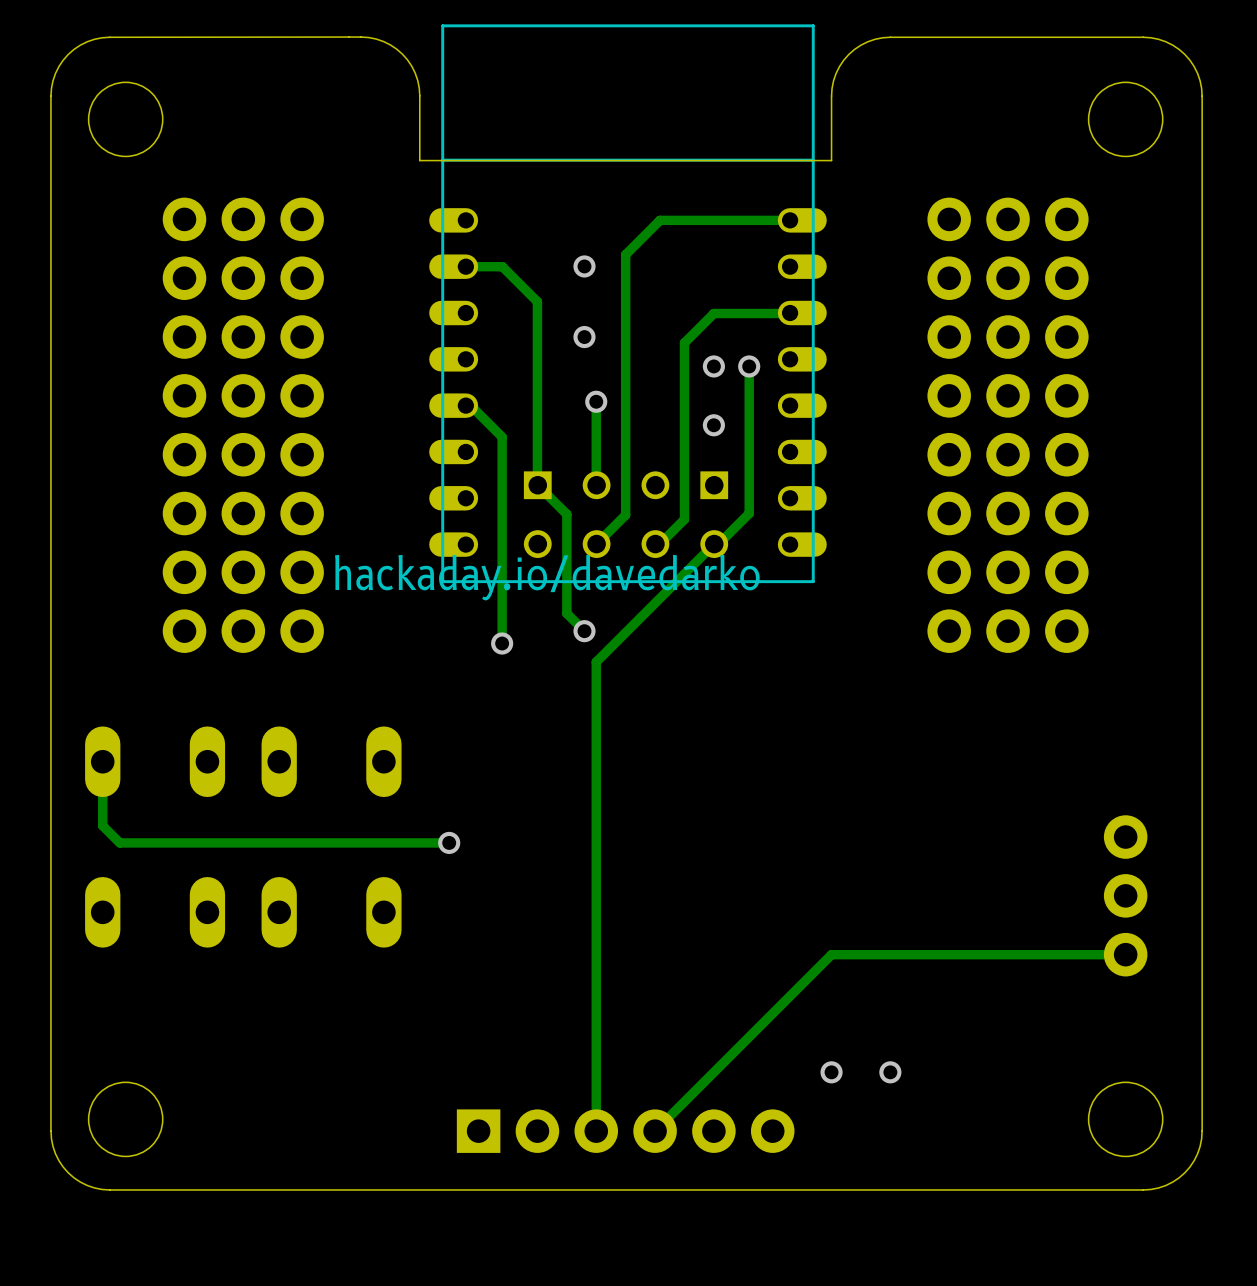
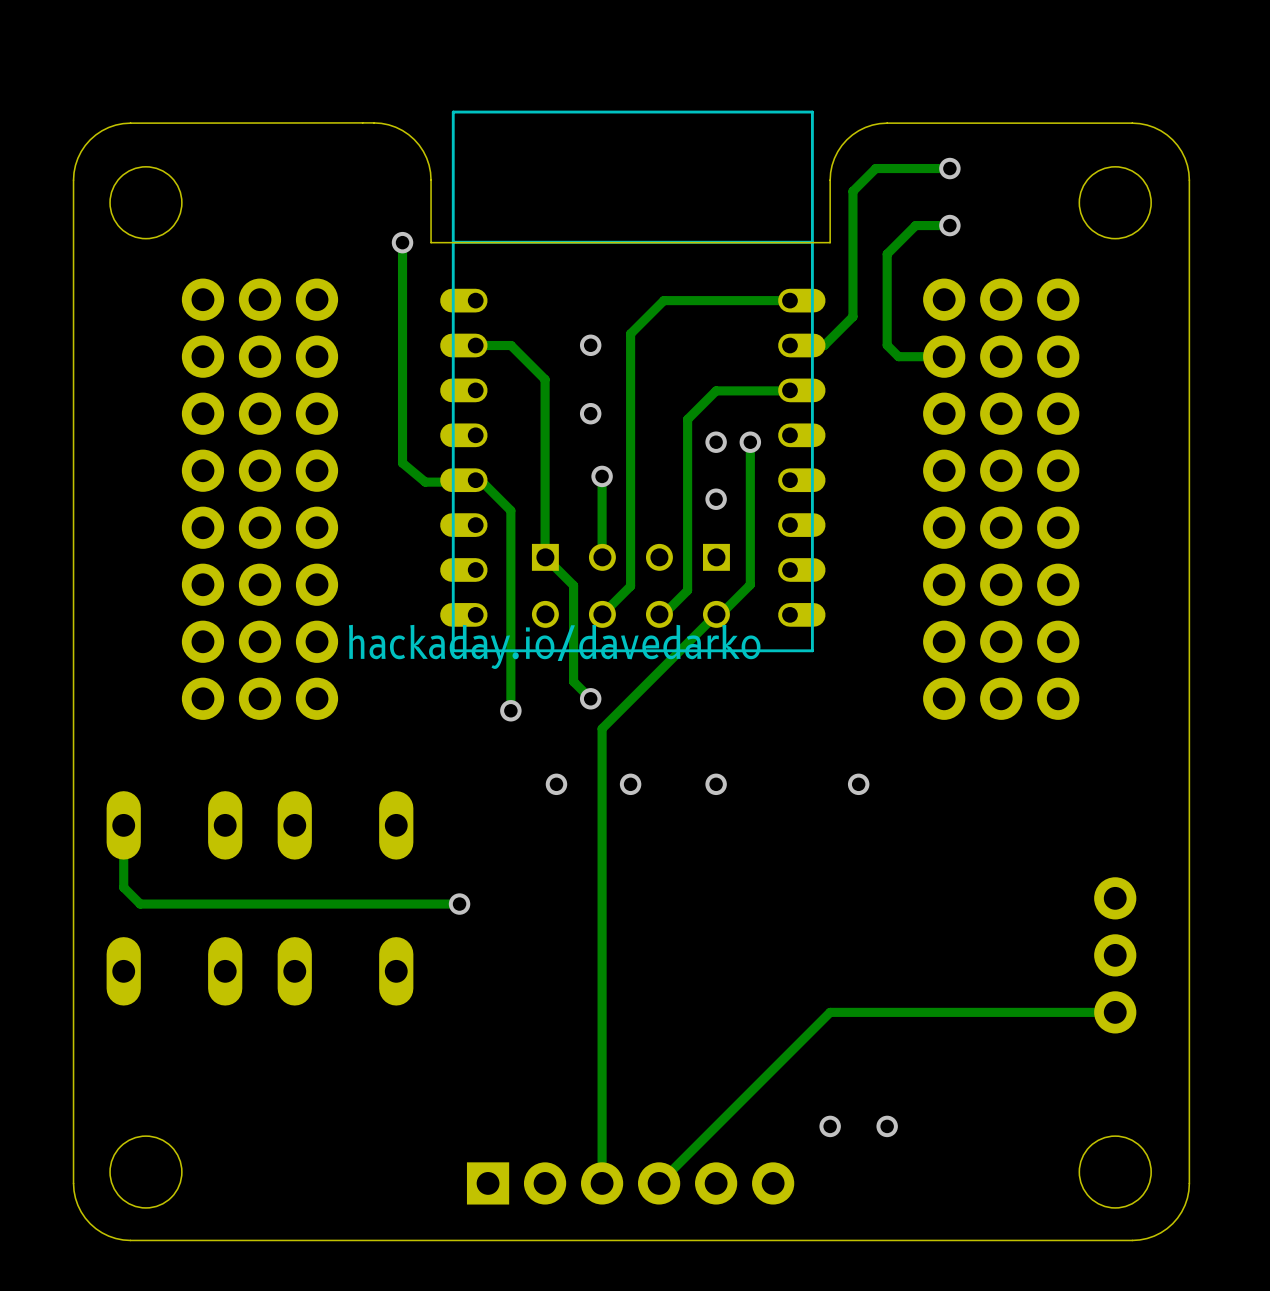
track: none -> (949, 168) (875, 168) (852, 191) (852, 316) (824, 345) (789, 345)
via: none -> (949, 168)
track: none -> (949, 225) (915, 225) (887, 254) (887, 345) (898, 356) (944, 356)
via: none -> (949, 225)
track: none -> (402, 242) (402, 463) (425, 482) (468, 482) (475, 480)
via: none -> (402, 242)
via: none -> (556, 784)
via: none -> (630, 784)
via: none -> (716, 784)
via: none -> (858, 784)

